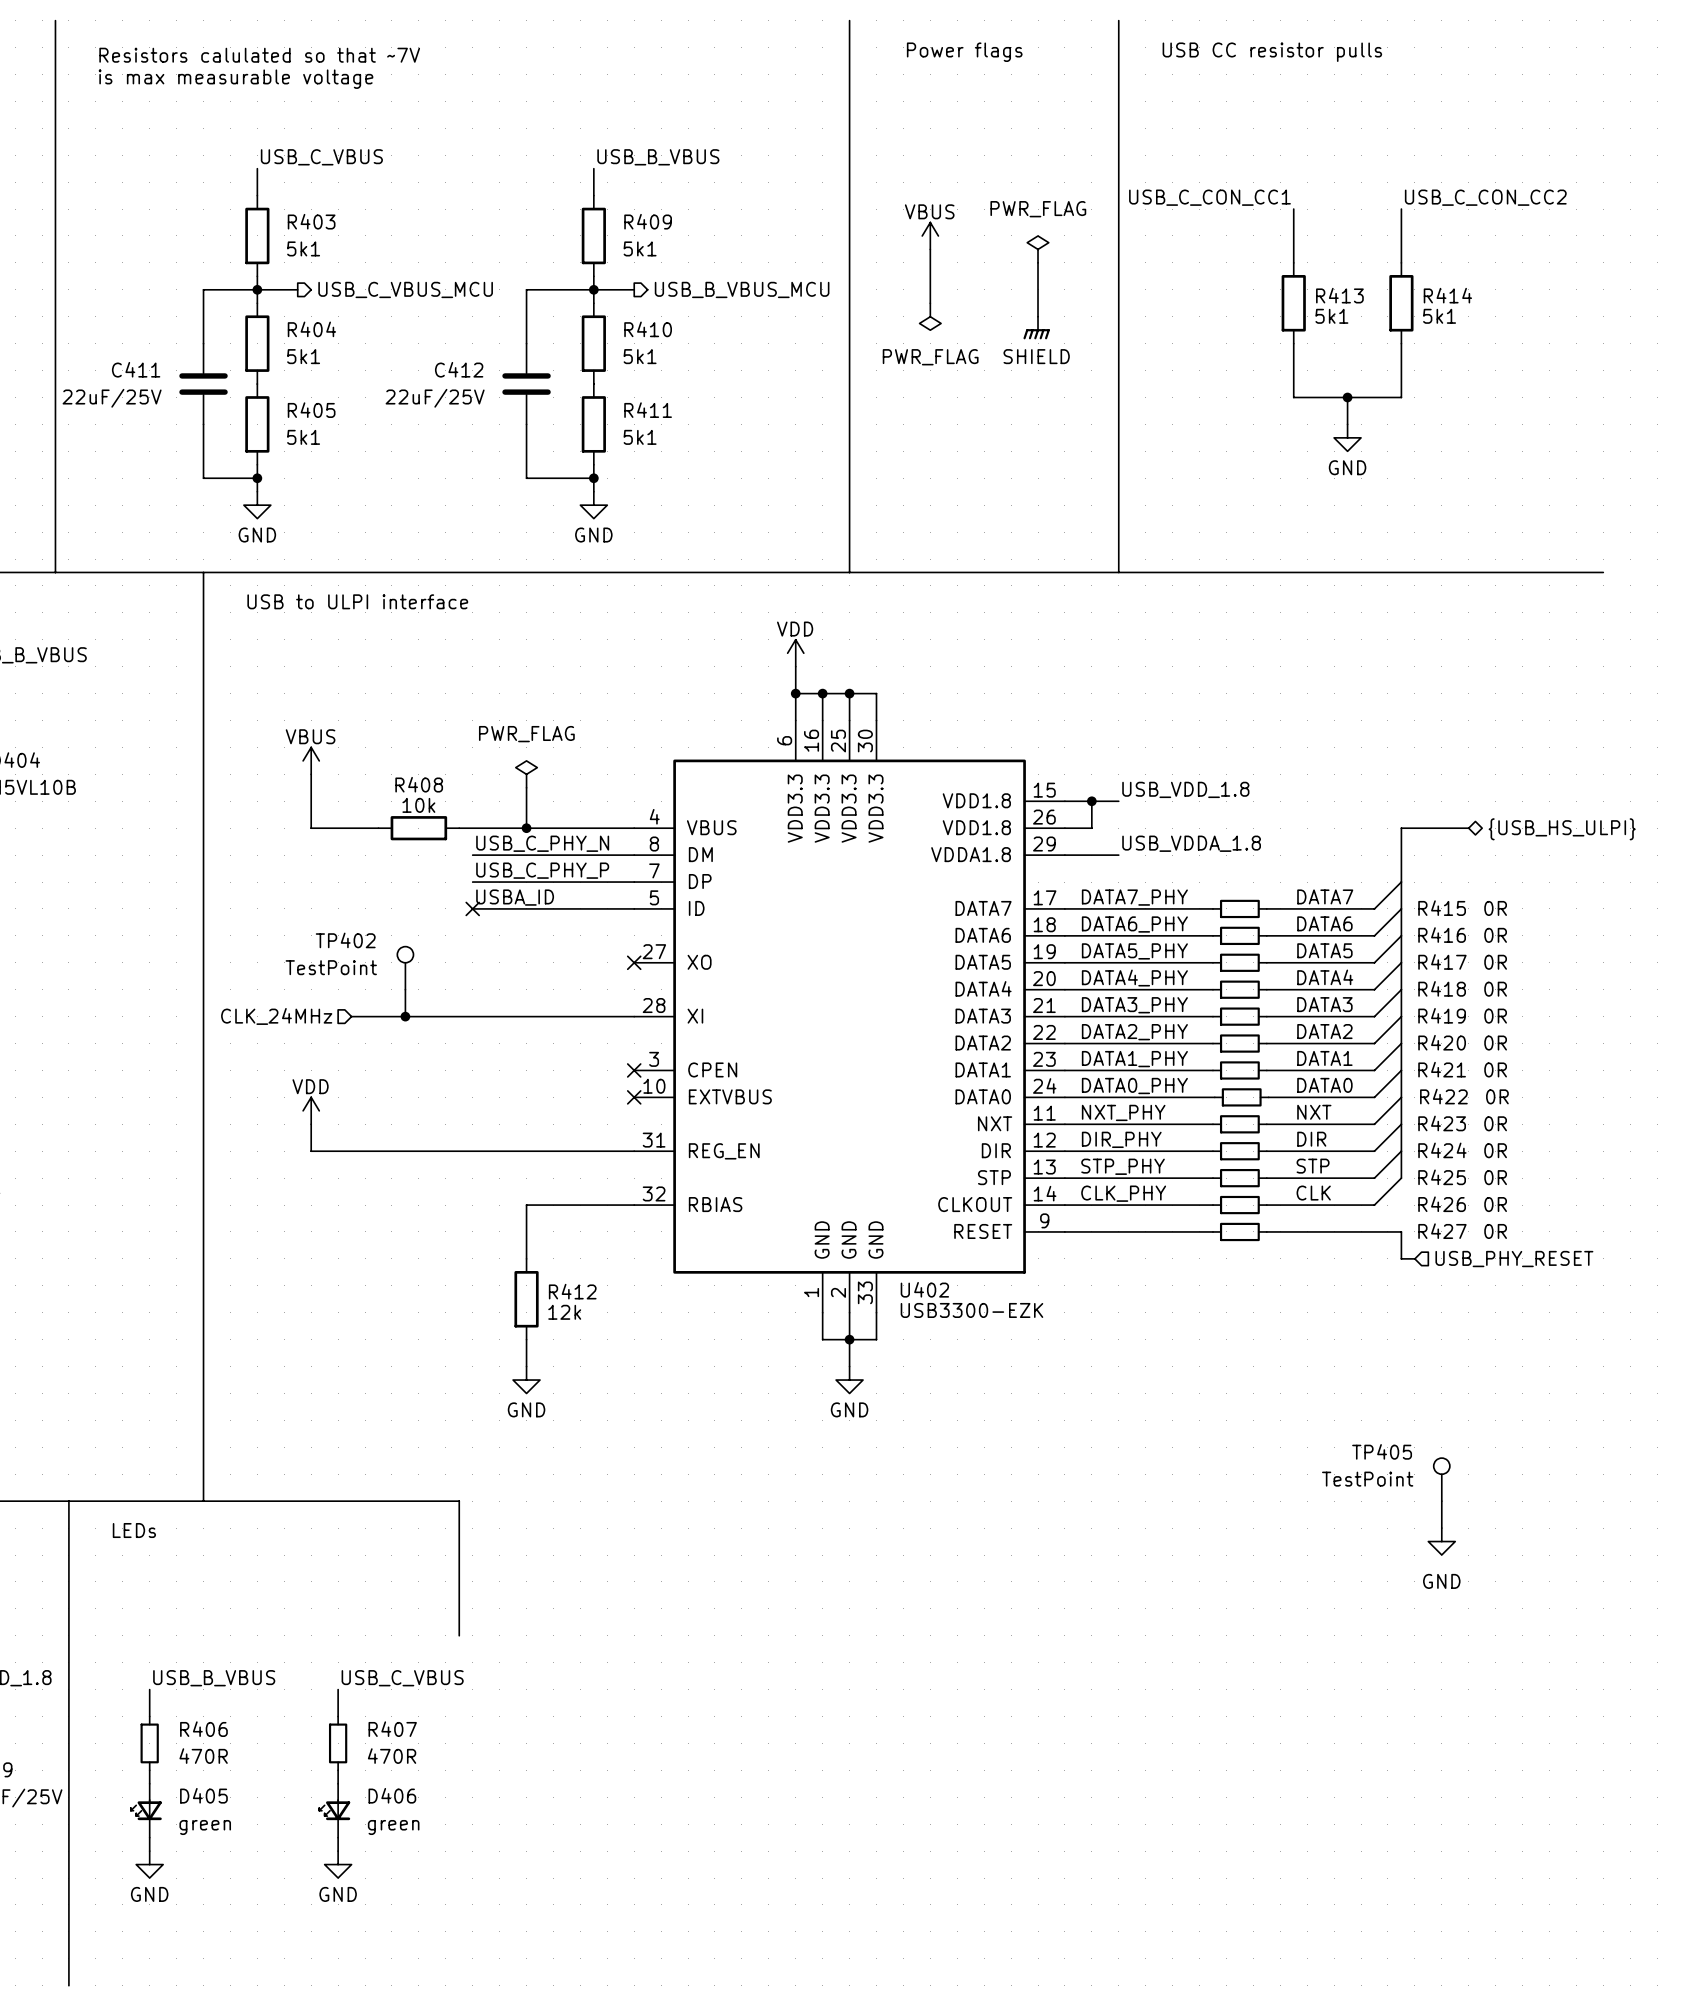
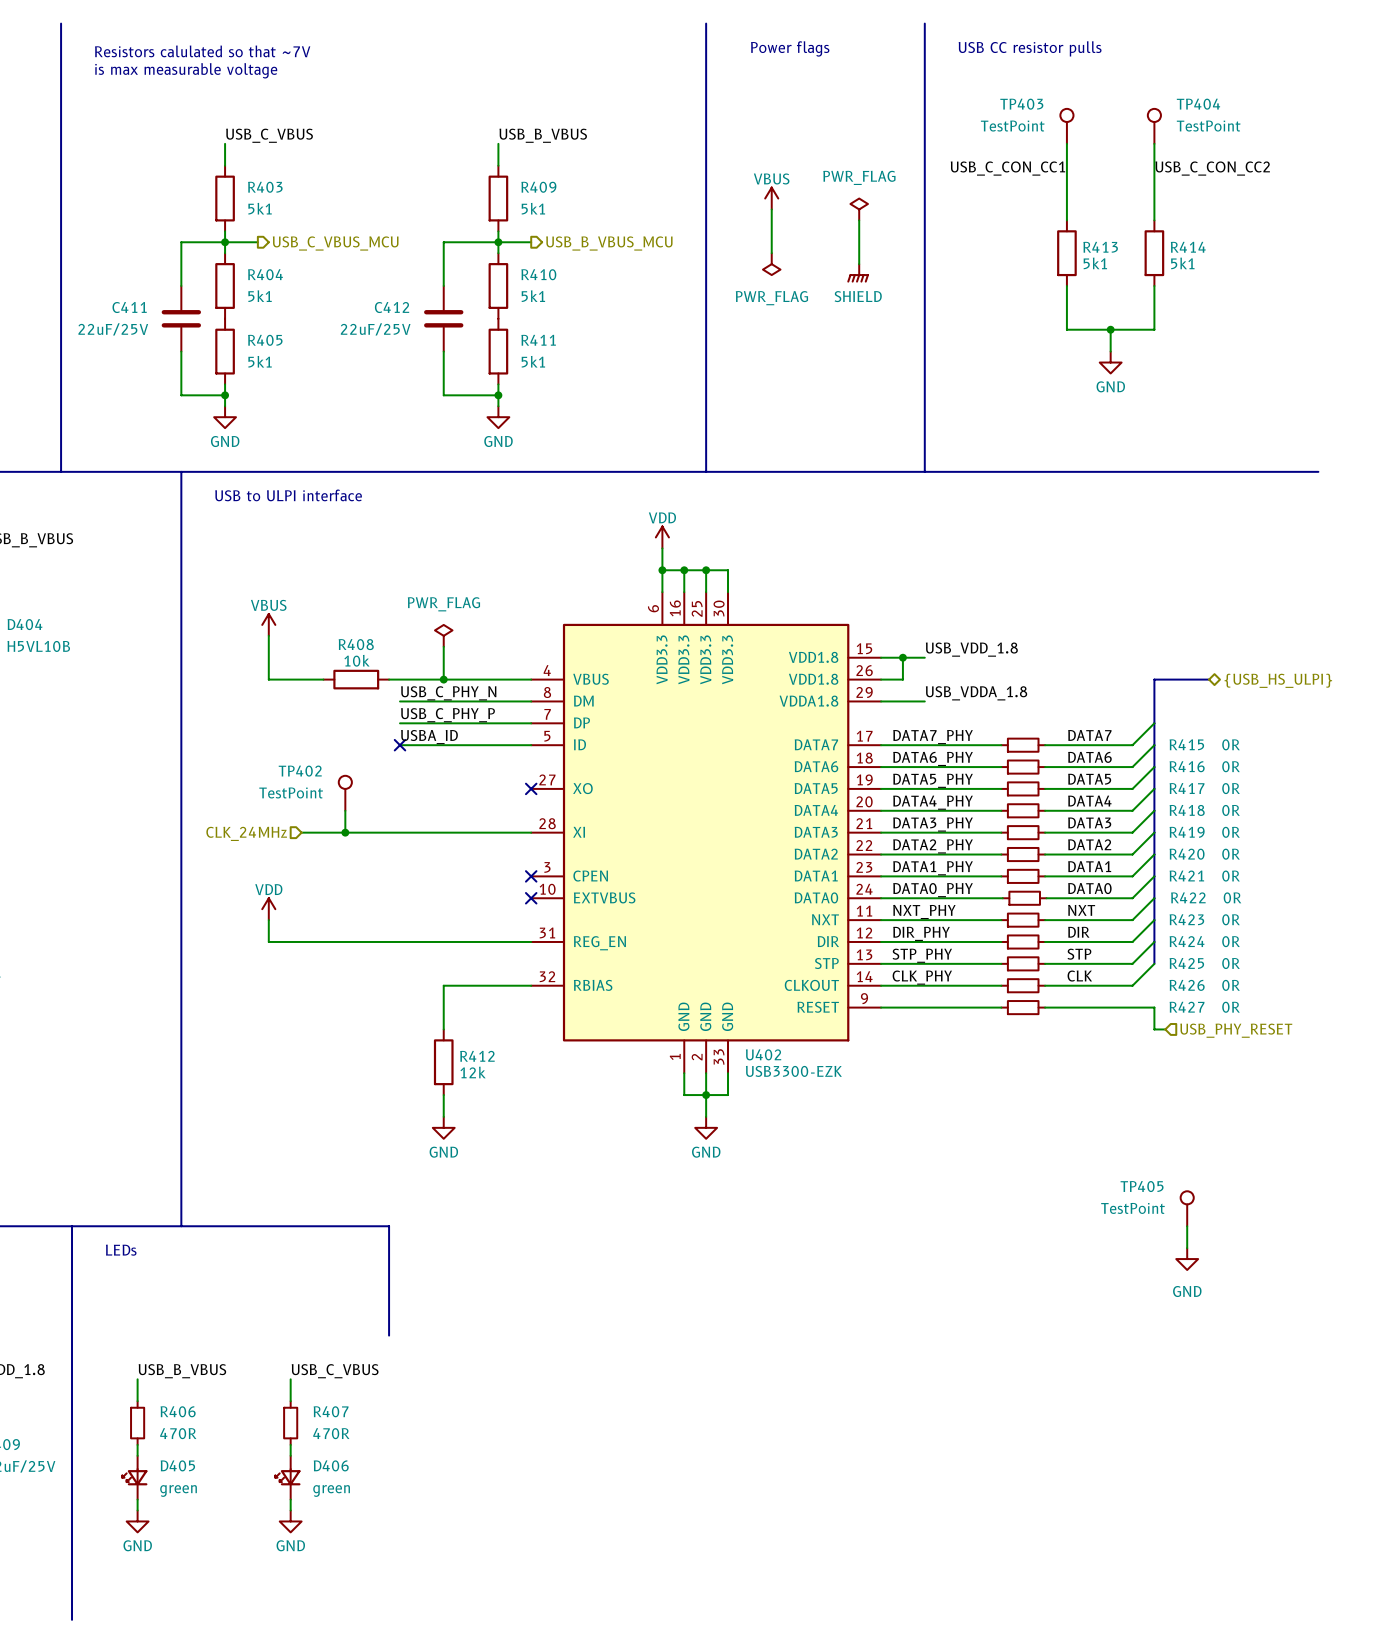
TP403: none -> TestPoint (1066, 126)
TP404: none -> TestPoint (1154, 126)
wire: none -> (1066, 143) (1066, 176)
wire: none -> (1154, 143) (1154, 176)

